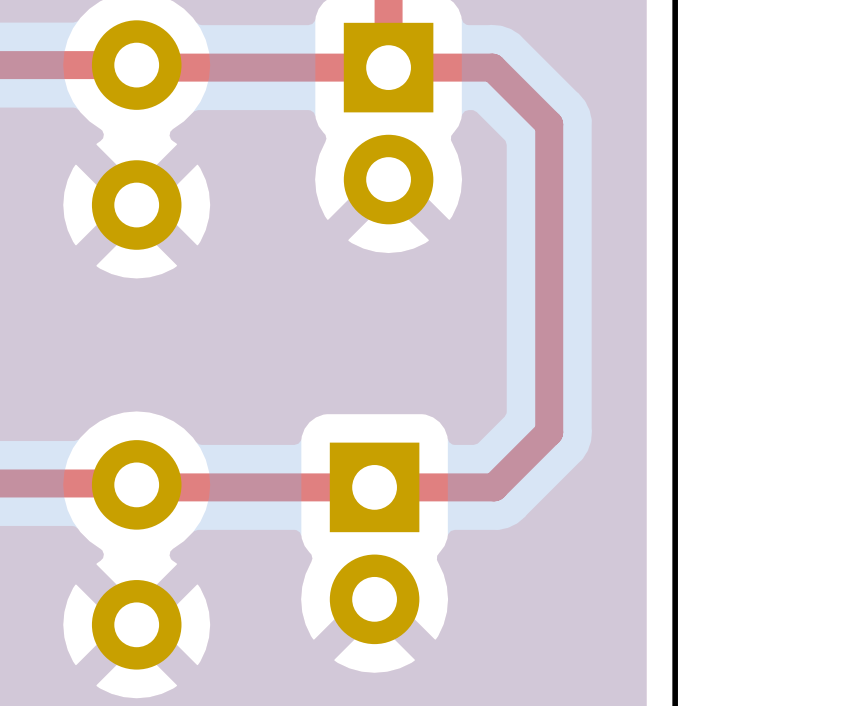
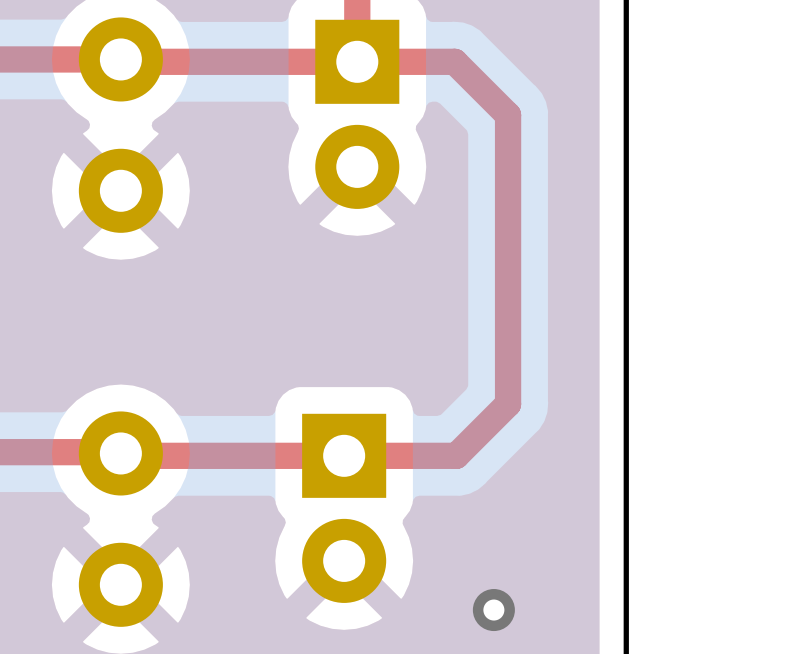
via: none -> (493, 610)

